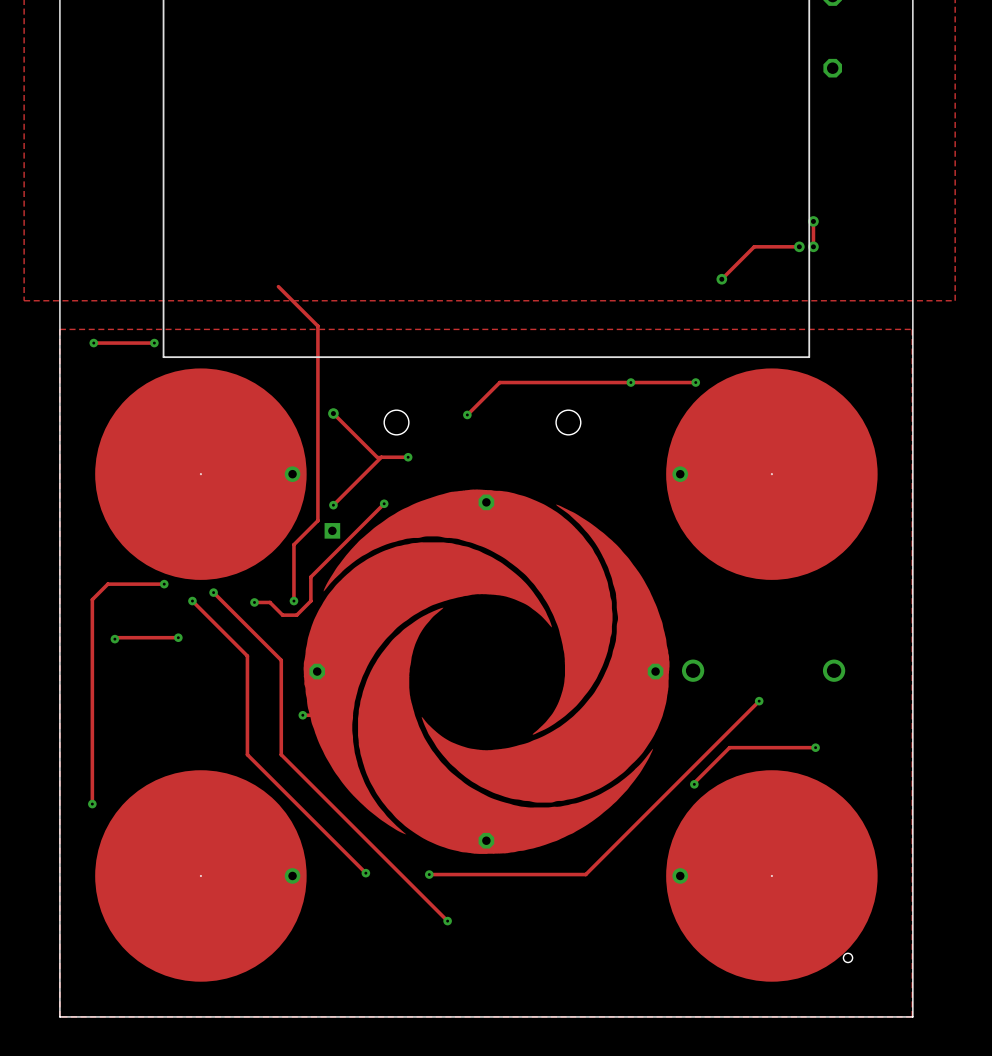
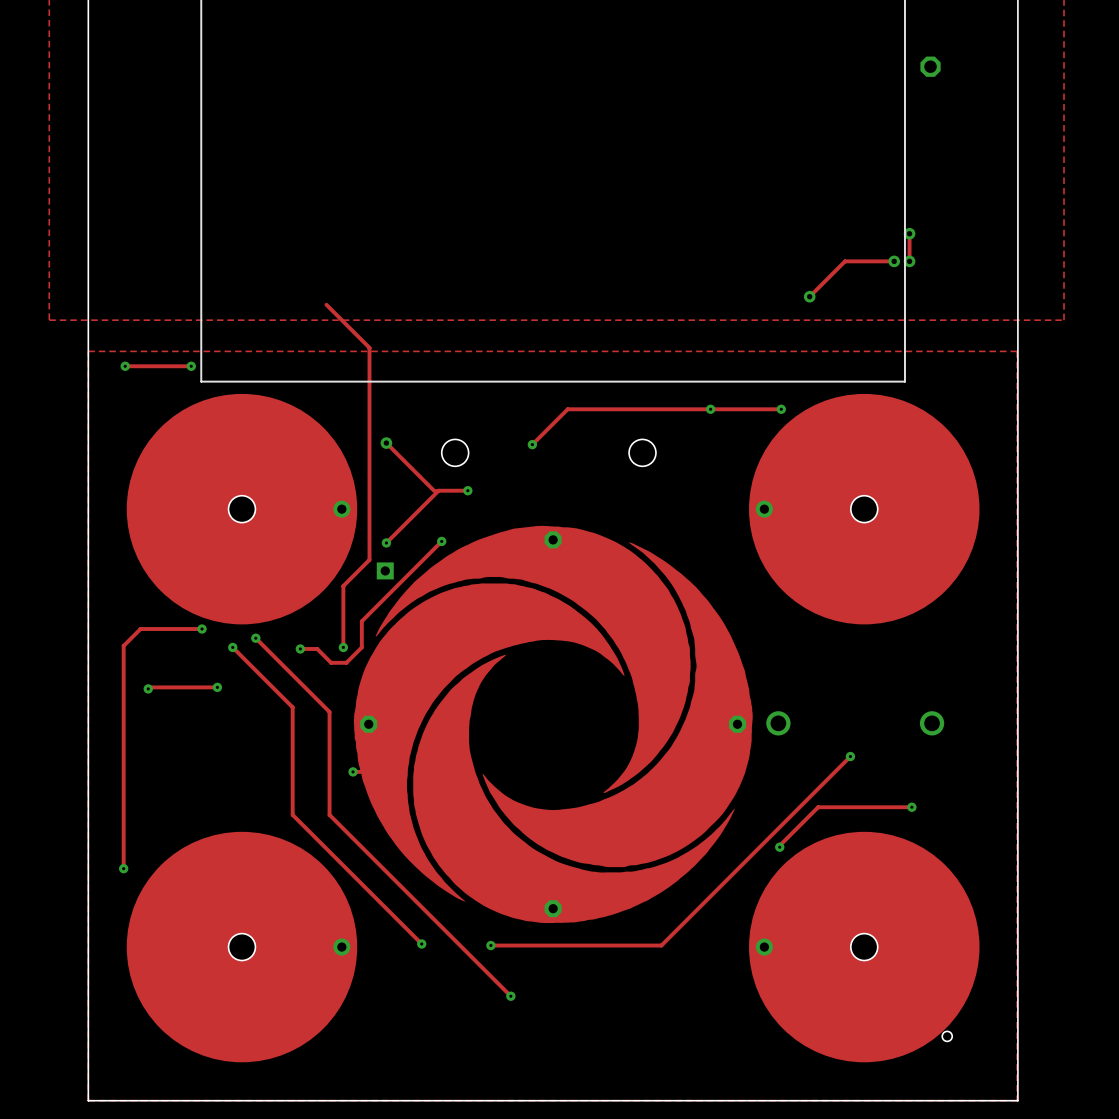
part footprint: [95, 368, 307, 580] -> [126, 393, 358, 625]
part footprint: [666, 368, 878, 580] -> [749, 393, 980, 625]
part footprint: [95, 770, 307, 982] -> [126, 831, 358, 1063]
part footprint: [666, 770, 878, 982] -> [749, 831, 980, 1063]

